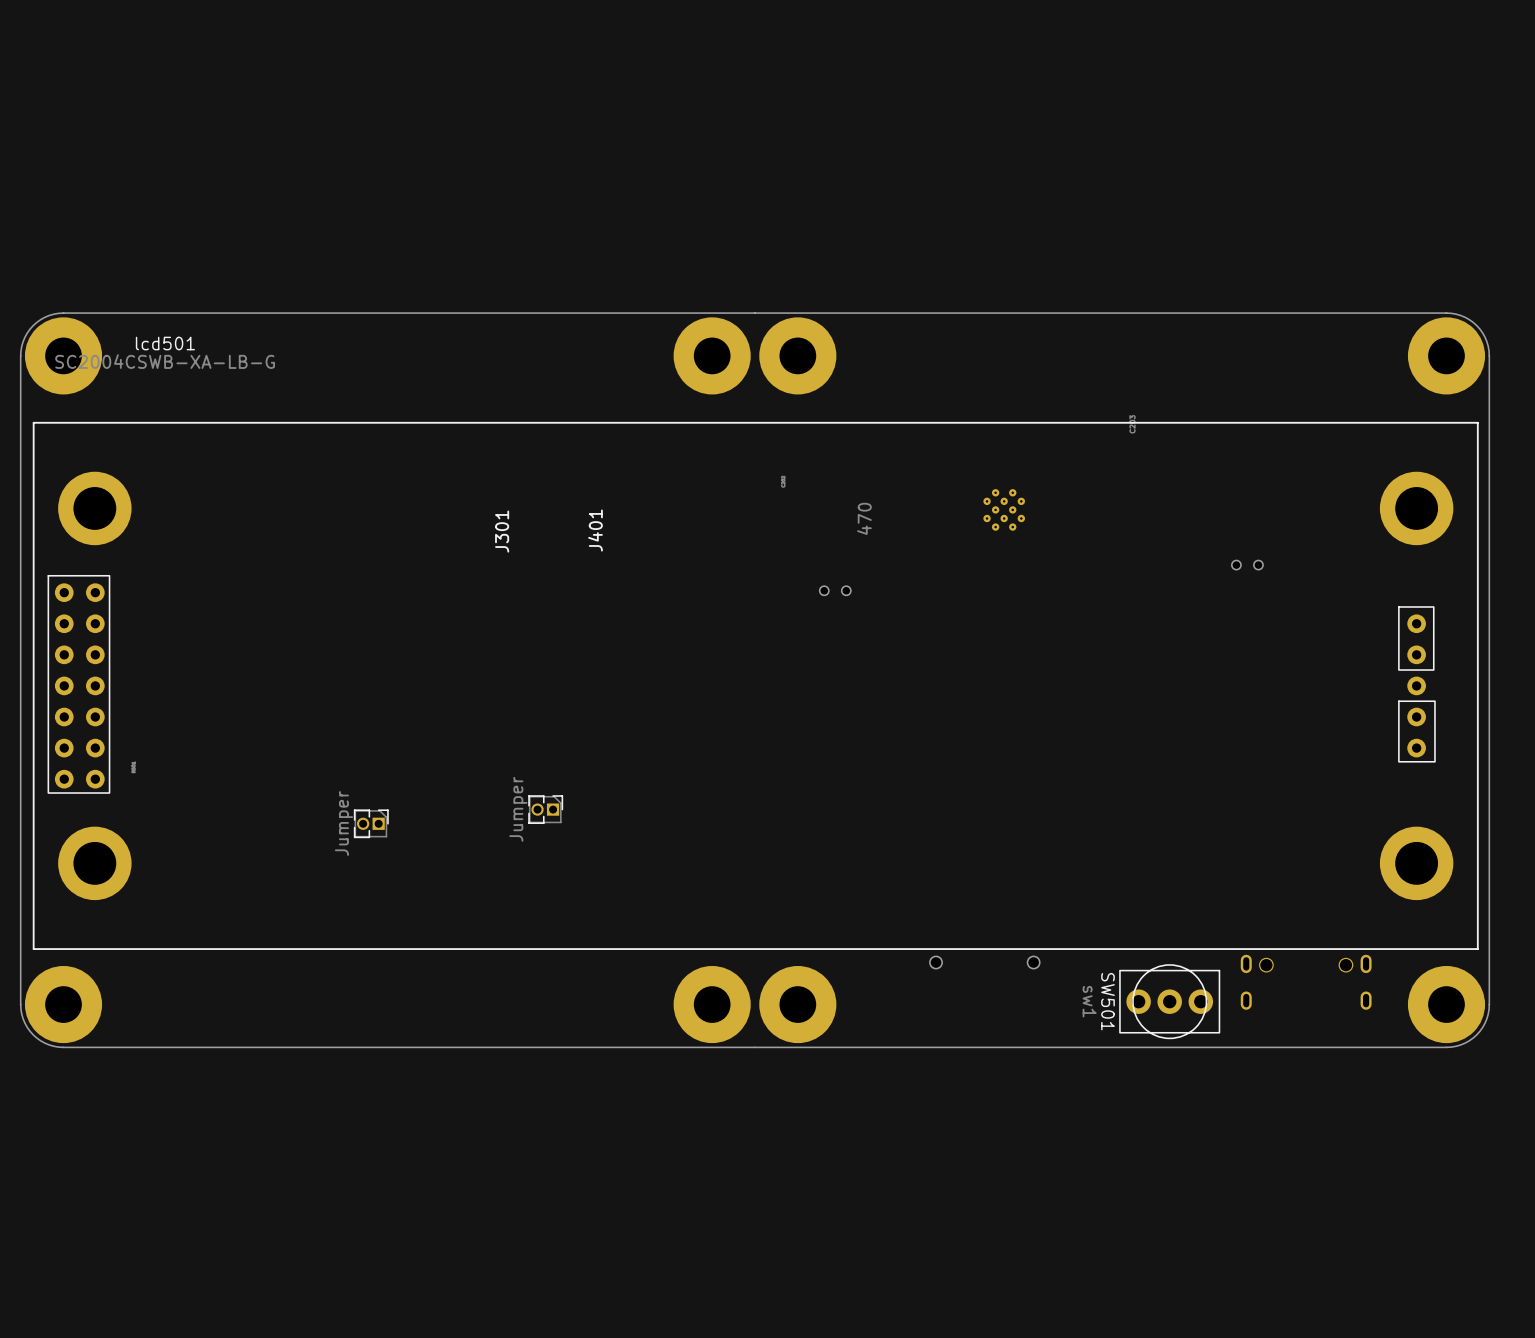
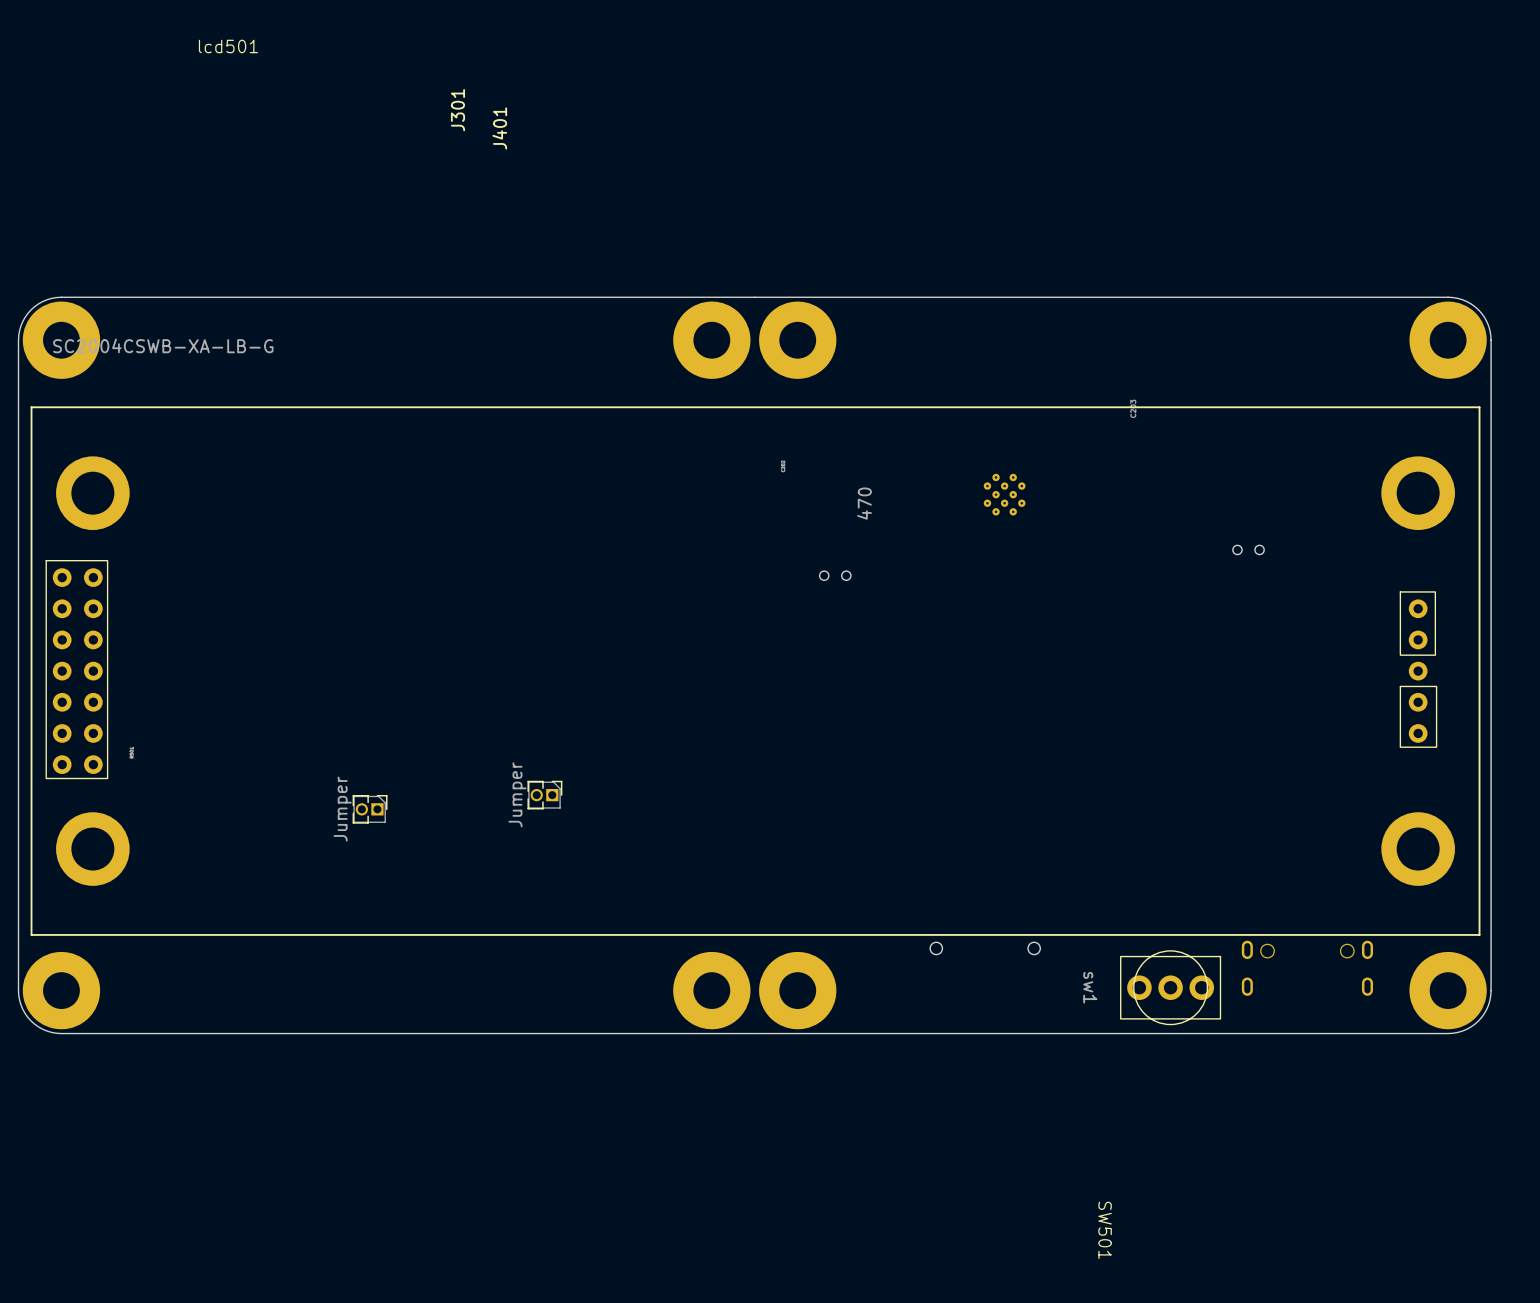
lcd501 name position: lcd501 (165, 343) -> lcd501 (228, 46)
J401 name position: J401 (595, 530) -> J401 (499, 128)
J301 name position: J301 (502, 531) -> J301 (457, 110)
SW501 name position: SW501 (1108, 1001) -> SW501 (1105, 1230)

